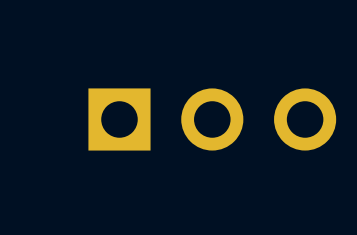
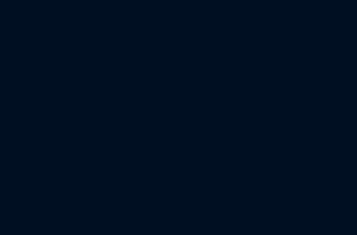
part: (212, 119) -> none

